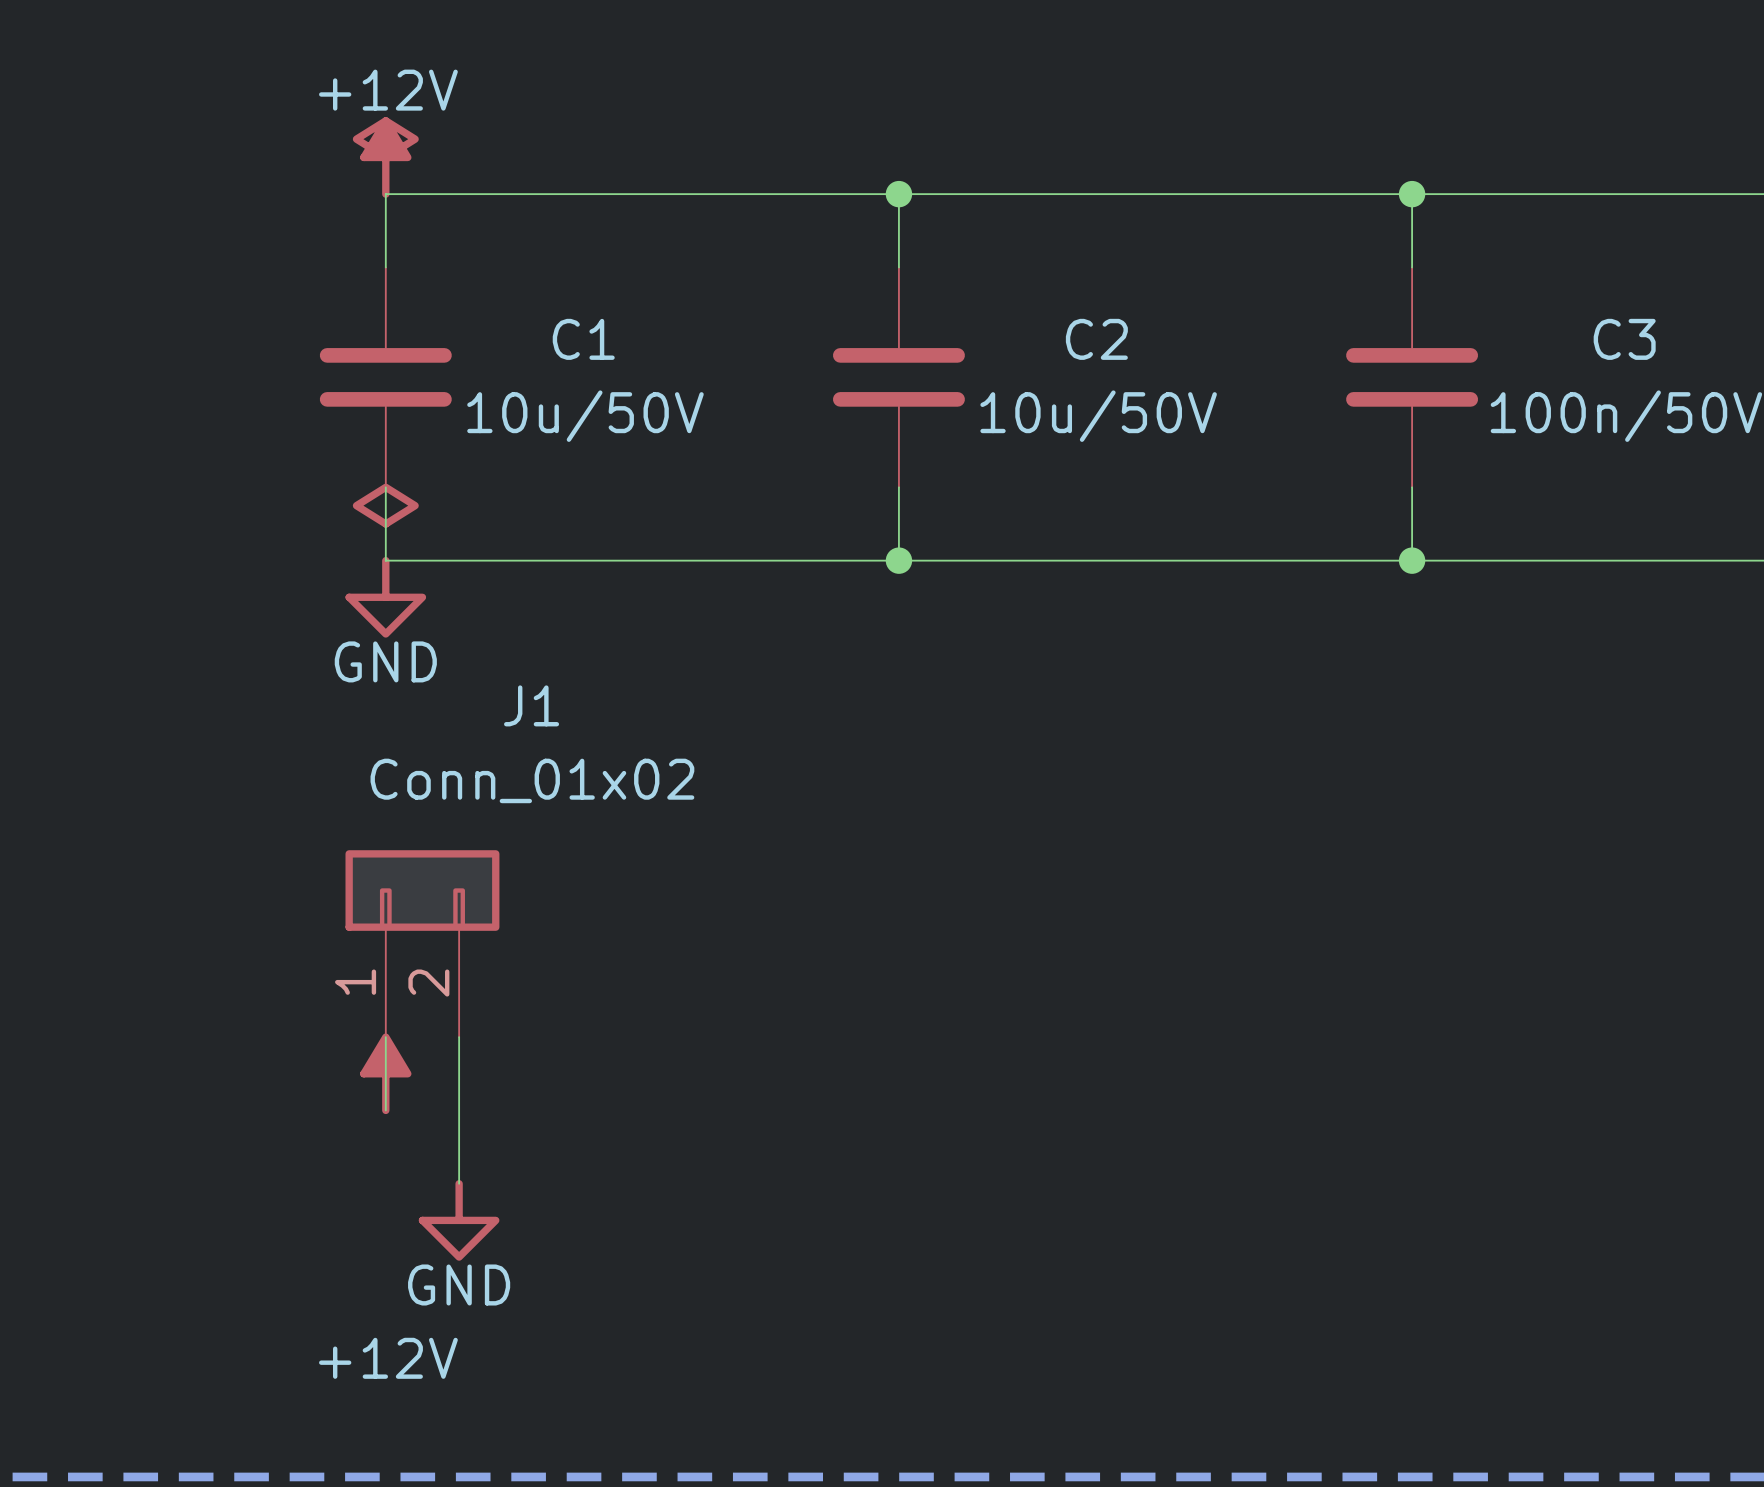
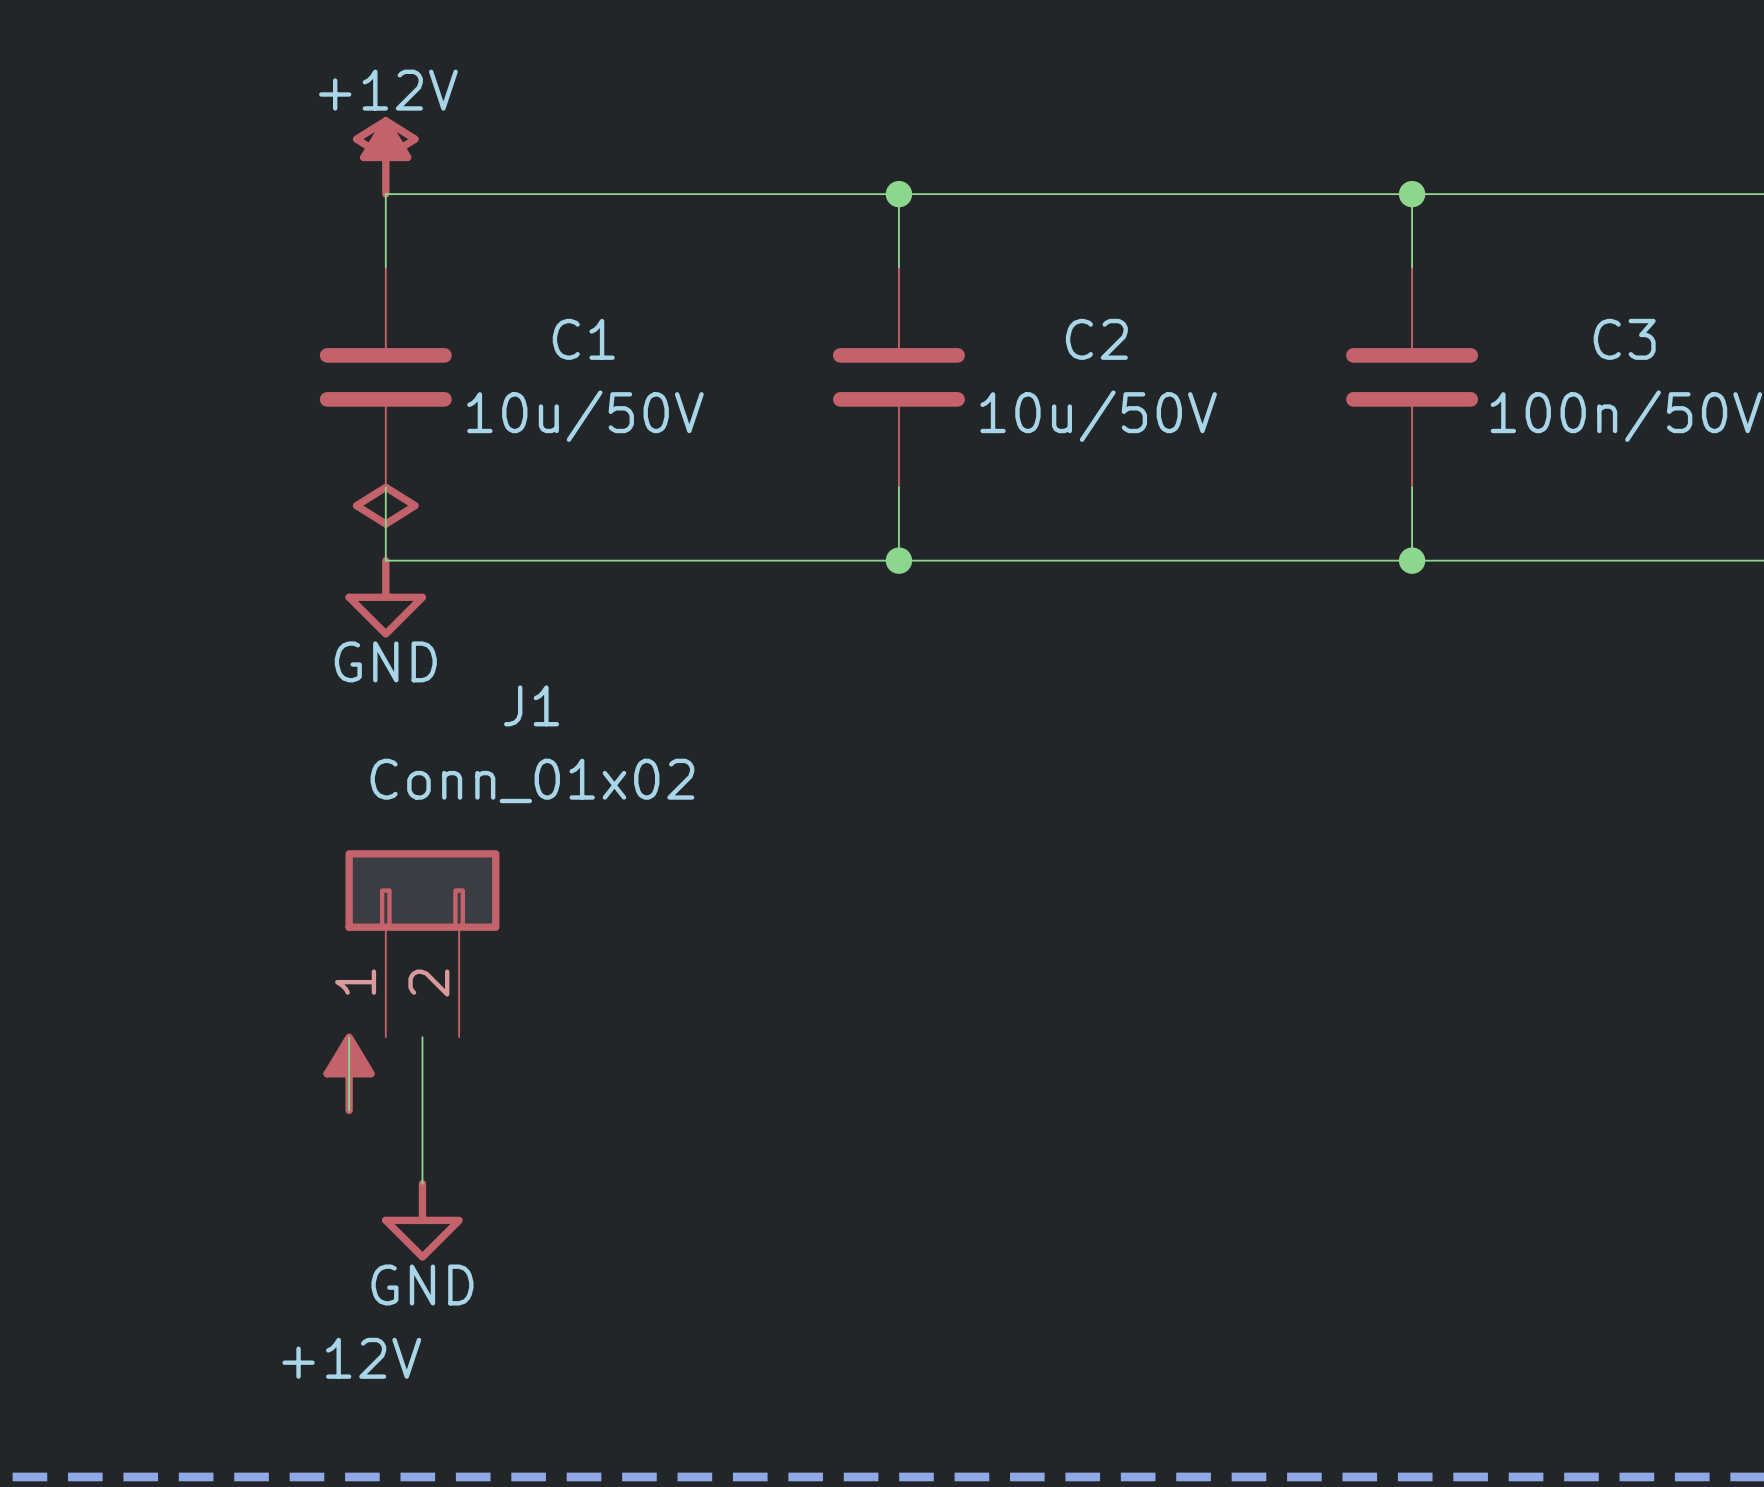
wire: (385, 1037) (385, 1110) -> (349, 1037) (349, 1110)
wire: (459, 1037) (459, 1183) -> (422, 1037) (422, 1183)
power symbol position: +12V (385, 1073) -> +12V (349, 1073)
power symbol position: GND (459, 1220) -> GND (422, 1220)

